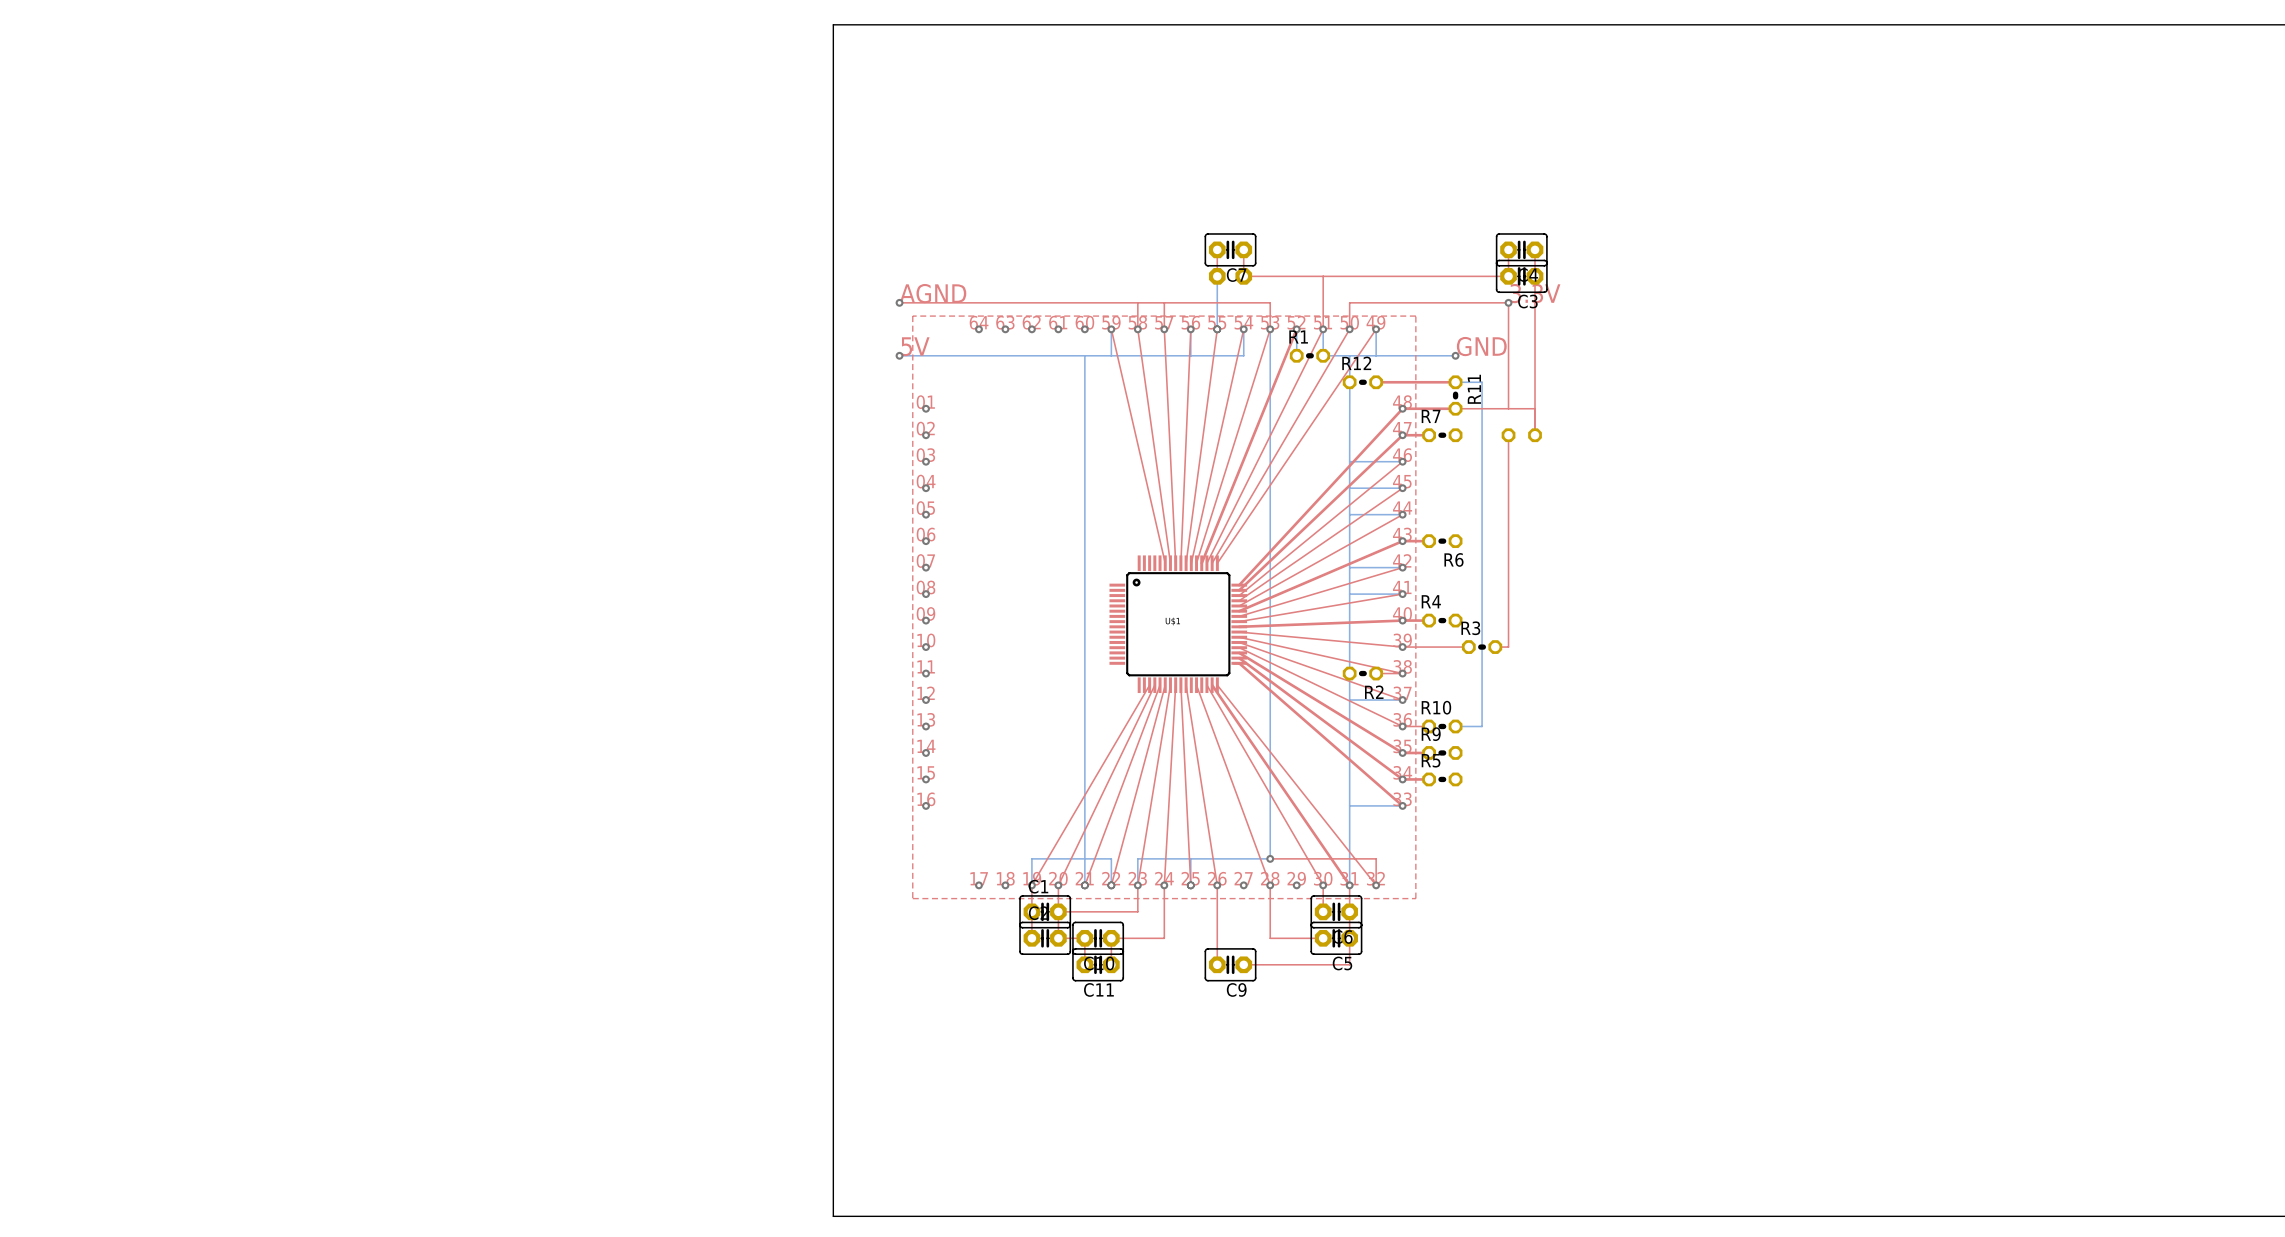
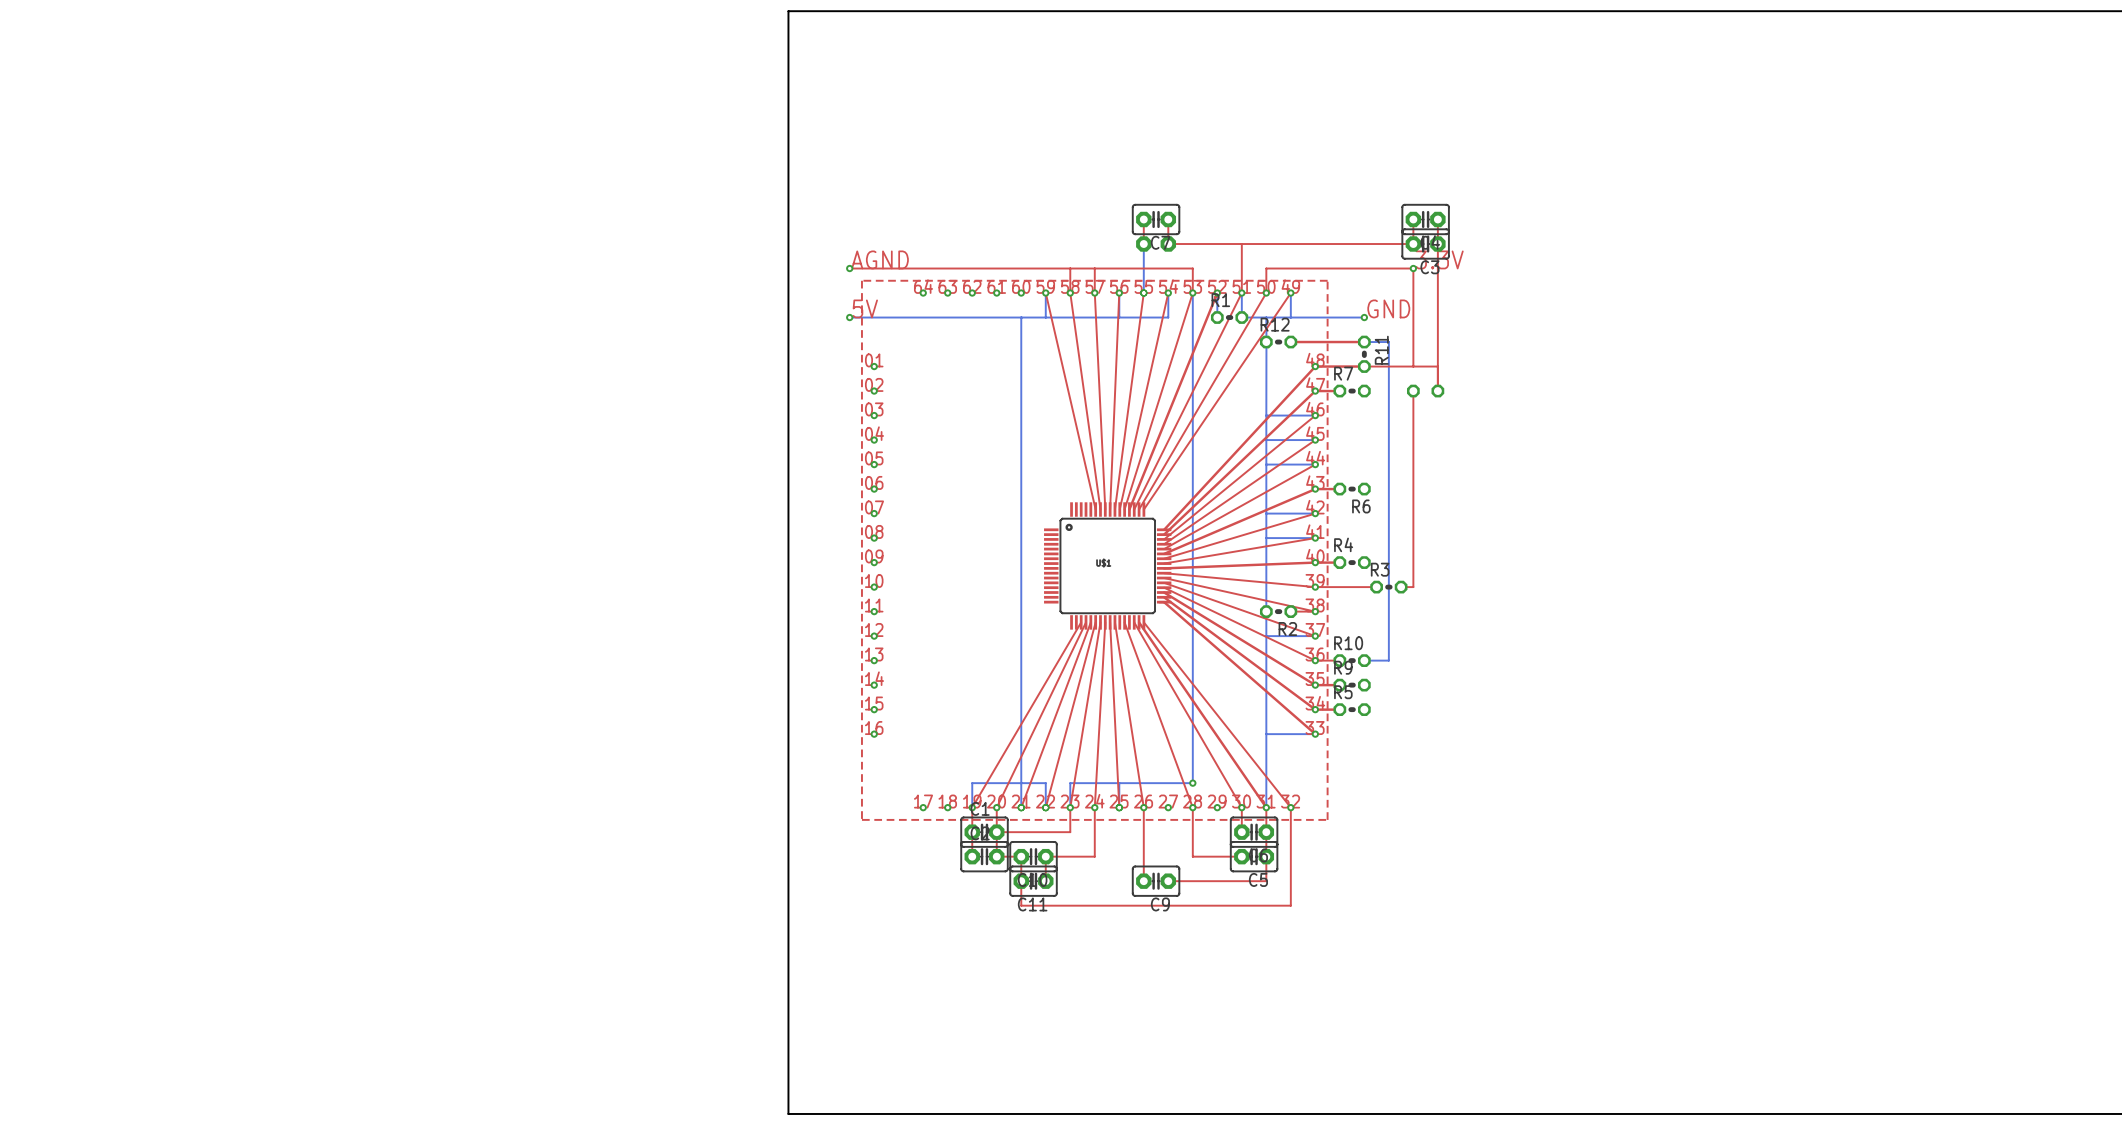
top track: (1270, 858) (1376, 858) (1376, 885) -> (1021, 881) (1021, 905) (1290, 905) (1290, 807)

